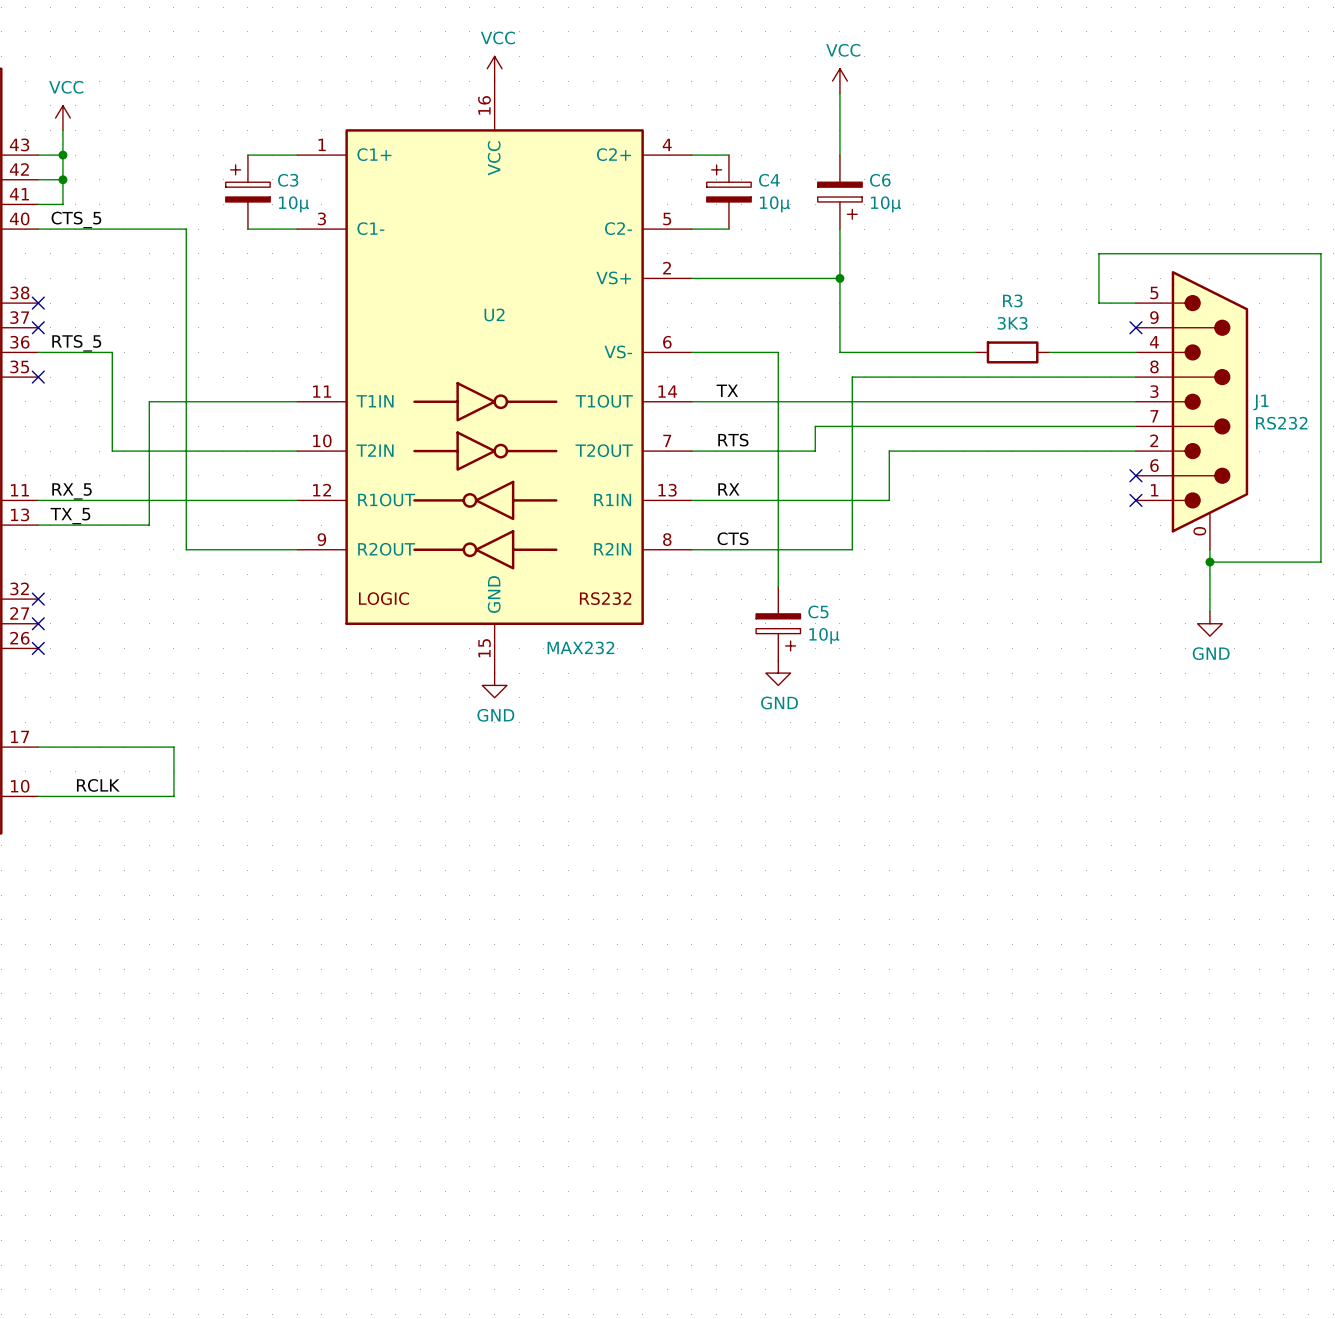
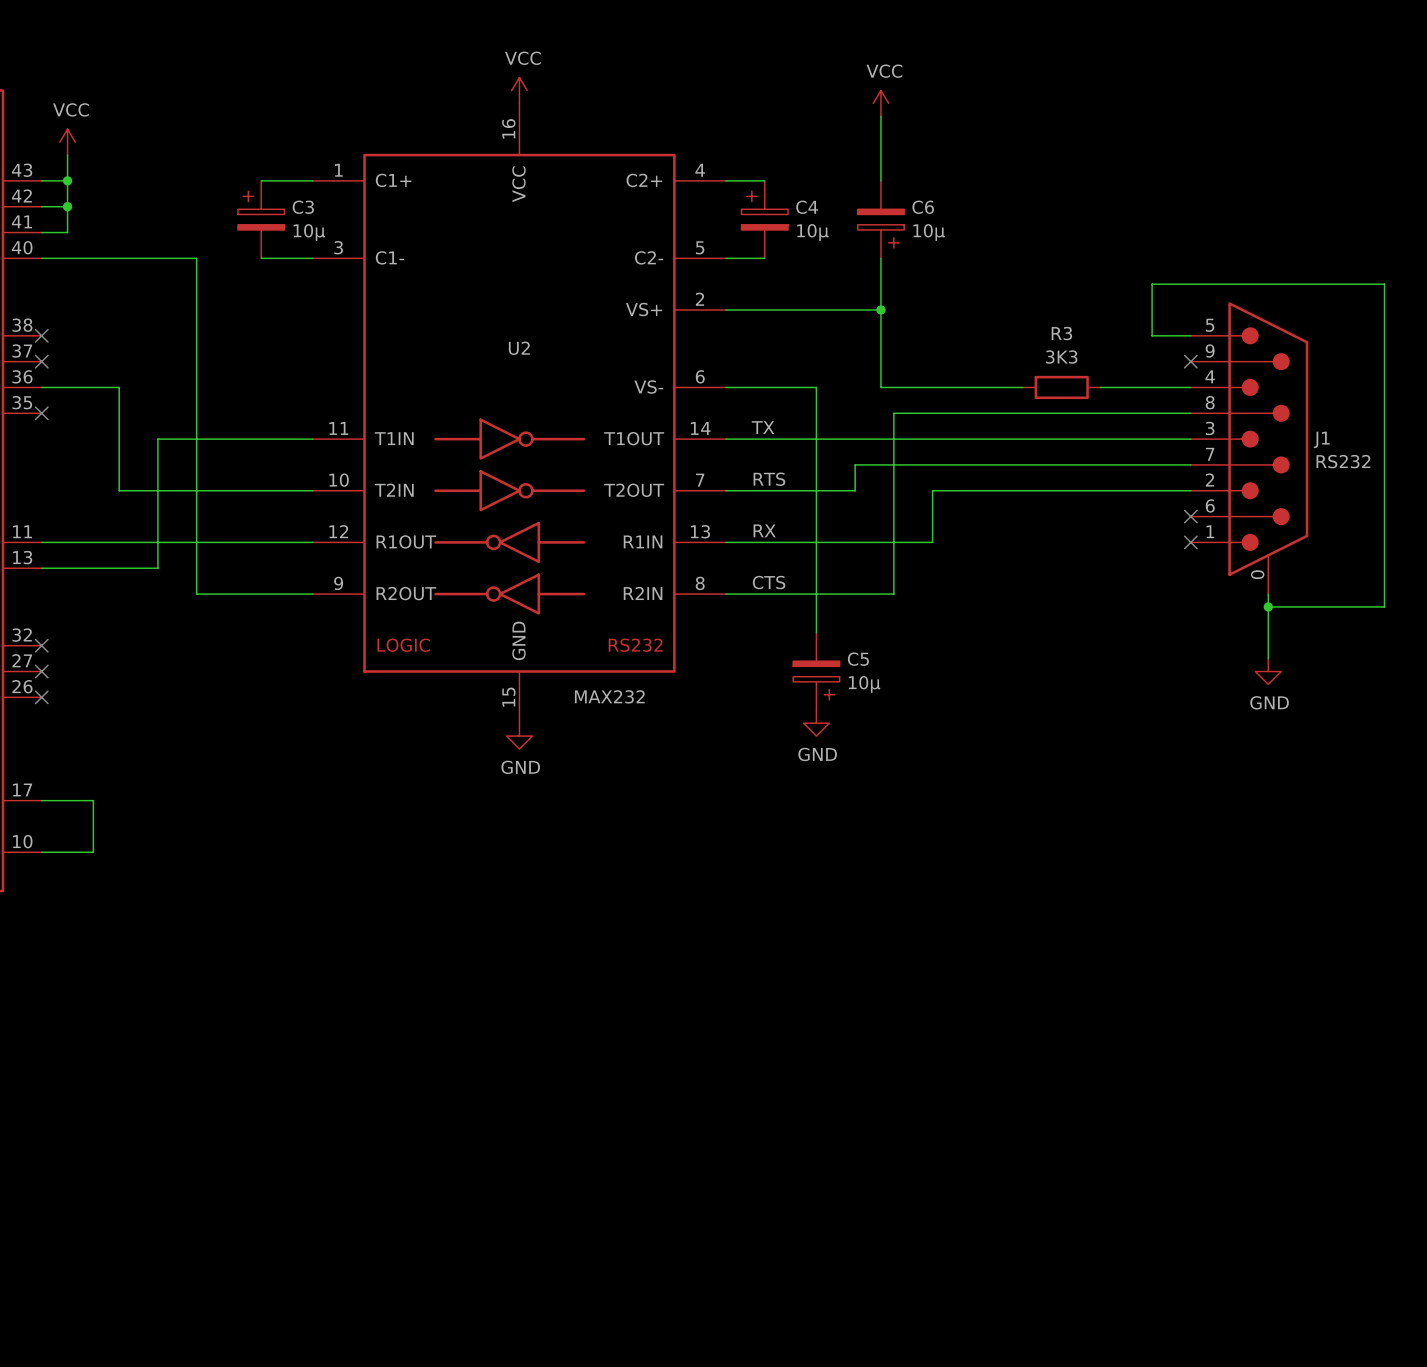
label: CTS_5 (76, 219) -> none
label: RTS_5 (76, 343) -> none
label: RX_5 (72, 491) -> none
label: TX_5 (70, 516) -> none
wire: (87, 747) (173, 747) (173, 796) (87, 796) -> (93, 800) (93, 852)
label: RCLK (98, 785) -> none

